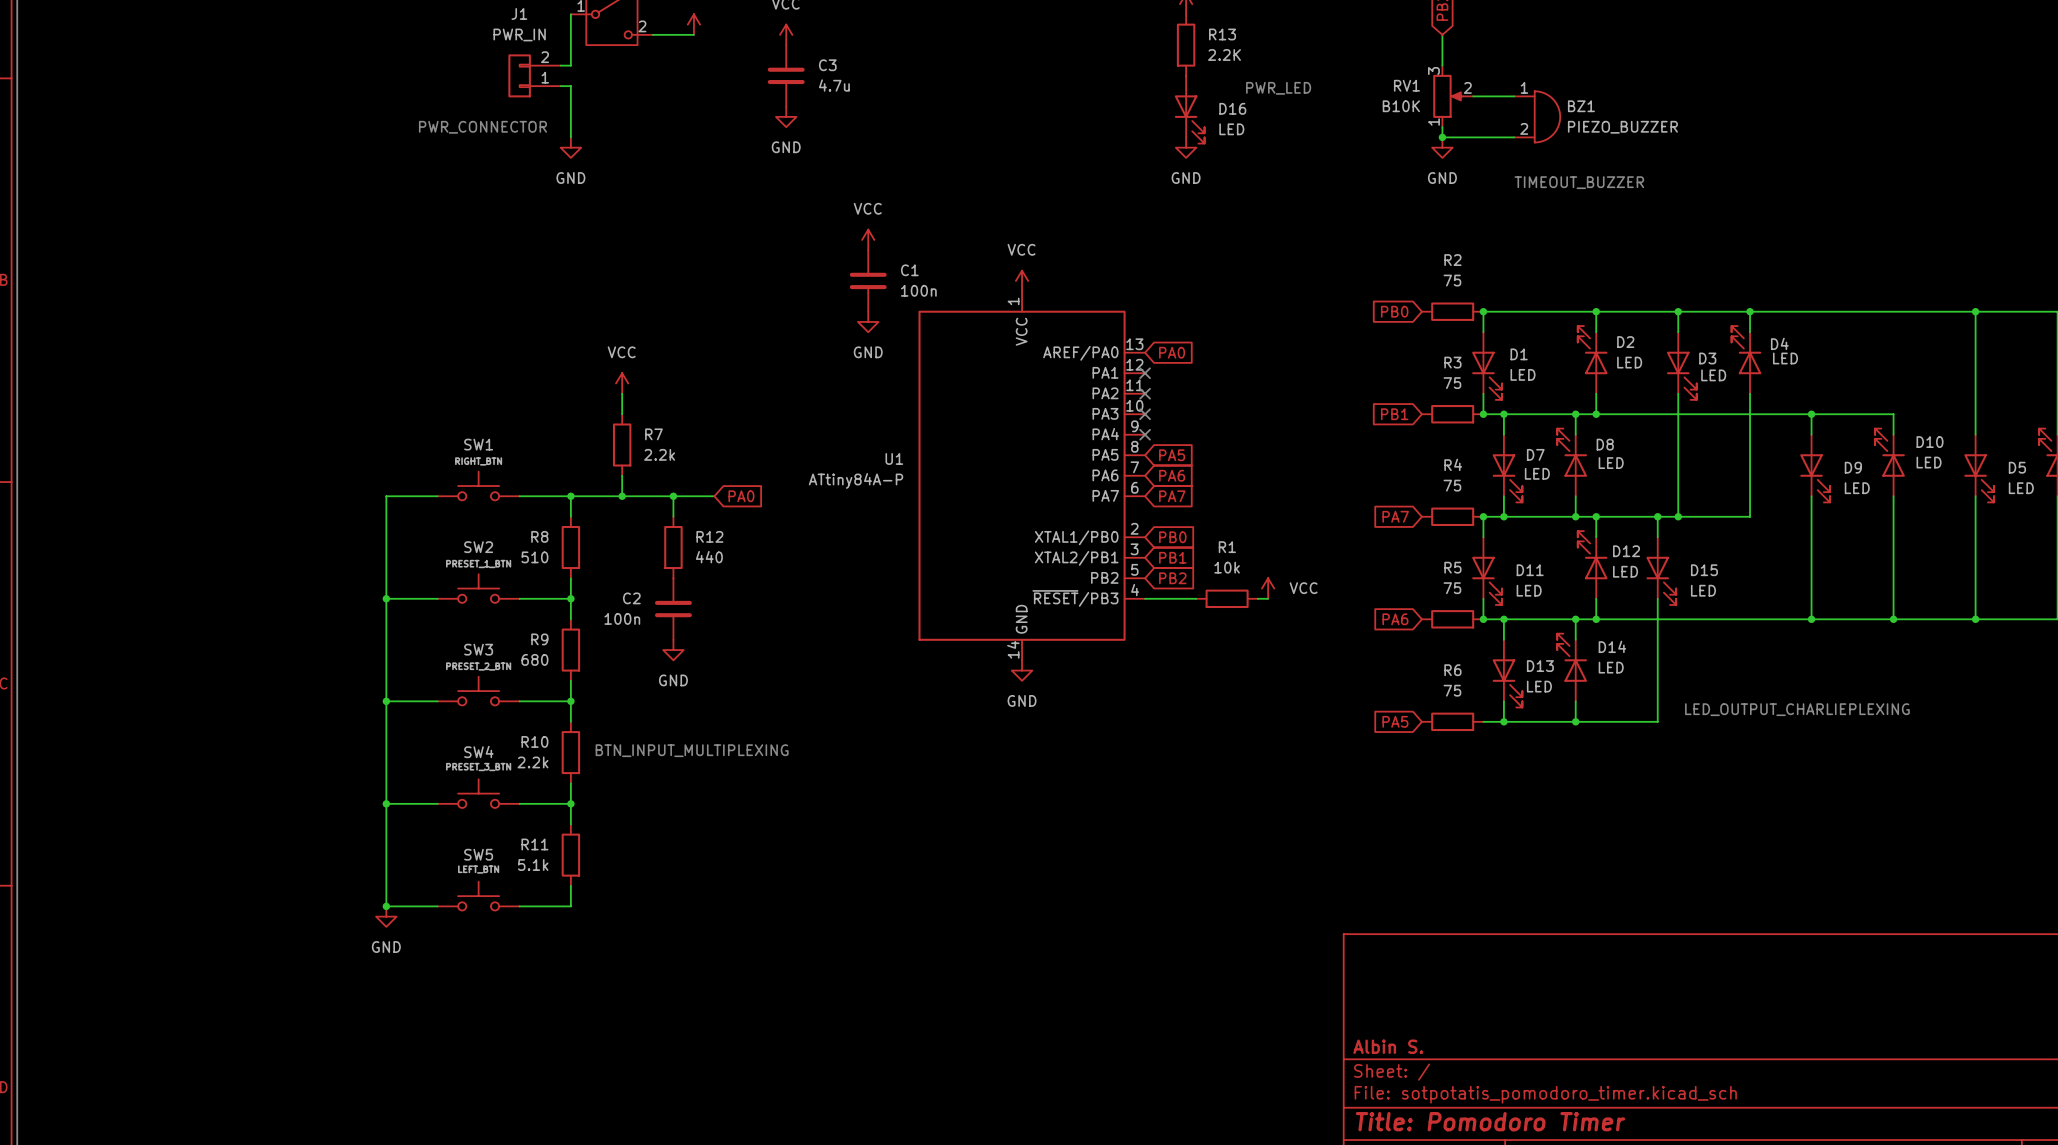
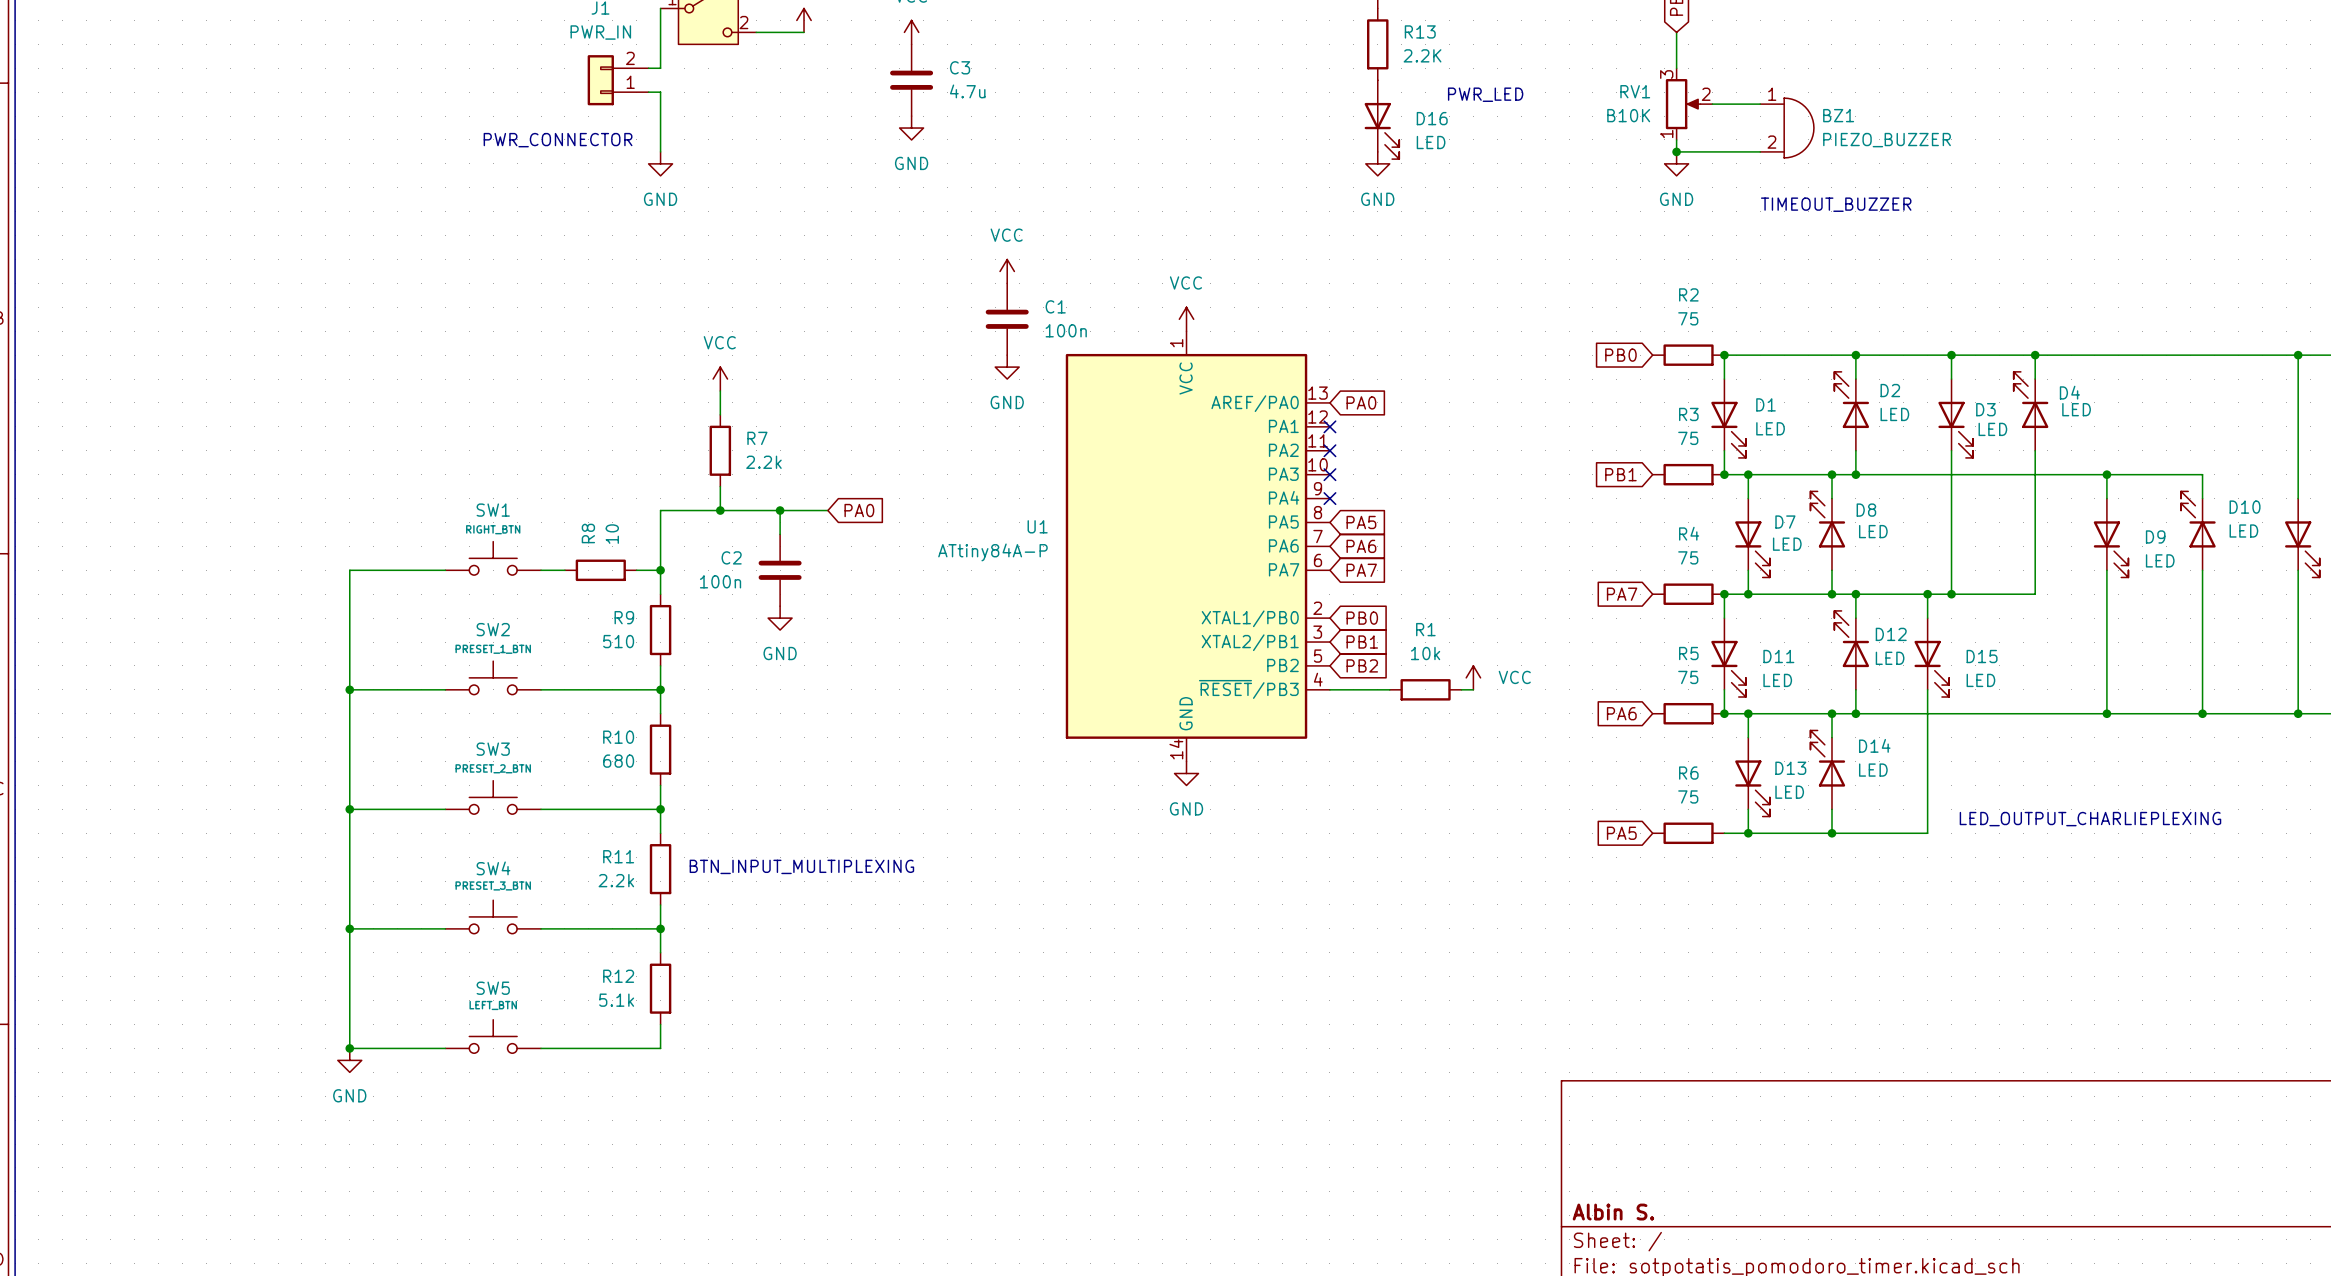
power symbol position: VCC (622, 383) -> VCC (720, 379)
wire: (622, 393) (622, 414) -> (720, 391) (720, 414)
junction: none -> (720, 510)
R7 position: (622, 444) -> (720, 450)
junction: none -> (780, 510)
wire: (622, 475) (622, 496) -> (720, 486) (720, 510)
SW1 position: (478, 486) -> (493, 558)
wire: none -> (445, 570) (349, 570) (349, 1048) (445, 1048)
wire: (437, 496) (386, 496) (386, 906) (437, 906) -> none
wire: none -> (541, 570) (564, 570)
wire: (519, 496) (550, 496) -> none
R8: none -> 10 (600, 570)
wire: (570, 496) (714, 496) -> (660, 570) (660, 510) (827, 510)
junction: (622, 496) -> none
junction: (673, 496) -> none
global label position: PA0 (741, 496) -> PA0 (859, 510)
R8 name: R8 (539, 536) -> R9 (624, 617)
R12: 440 (673, 547) -> none
SW2 position: (478, 588) -> (493, 677)
junction: none -> (349, 689)
wire: (386, 598) (437, 598) -> (445, 689) (349, 689)
junction: (386, 598) -> none
wire: none -> (541, 689) (600, 689)
C2 position: (673, 609) -> (780, 570)
R9 name: R9 (539, 639) -> R10 (618, 737)
power symbol position: GND (673, 650) -> GND (780, 618)
SW3 position: (478, 691) -> (493, 797)
junction: none -> (349, 809)
wire: (386, 701) (437, 701) -> (445, 809) (349, 809)
junction: (386, 701) -> none
wire: none -> (541, 809) (600, 809)
R10 name: R10 (534, 741) -> R11 (618, 856)
SW4 position: (478, 793) -> (493, 916)
junction: none -> (349, 928)
wire: (386, 803) (437, 803) -> (445, 928) (349, 928)
junction: (386, 803) -> none
wire: none -> (541, 928) (600, 928)
R11 name: R11 (534, 844) -> R12 (618, 976)
SW5 position: (478, 896) -> (493, 1036)
junction: none -> (349, 1048)
junction: (386, 906) -> none
wire: none -> (541, 1048) (600, 1048)
power symbol position: GND (386, 916) -> GND (349, 1060)

